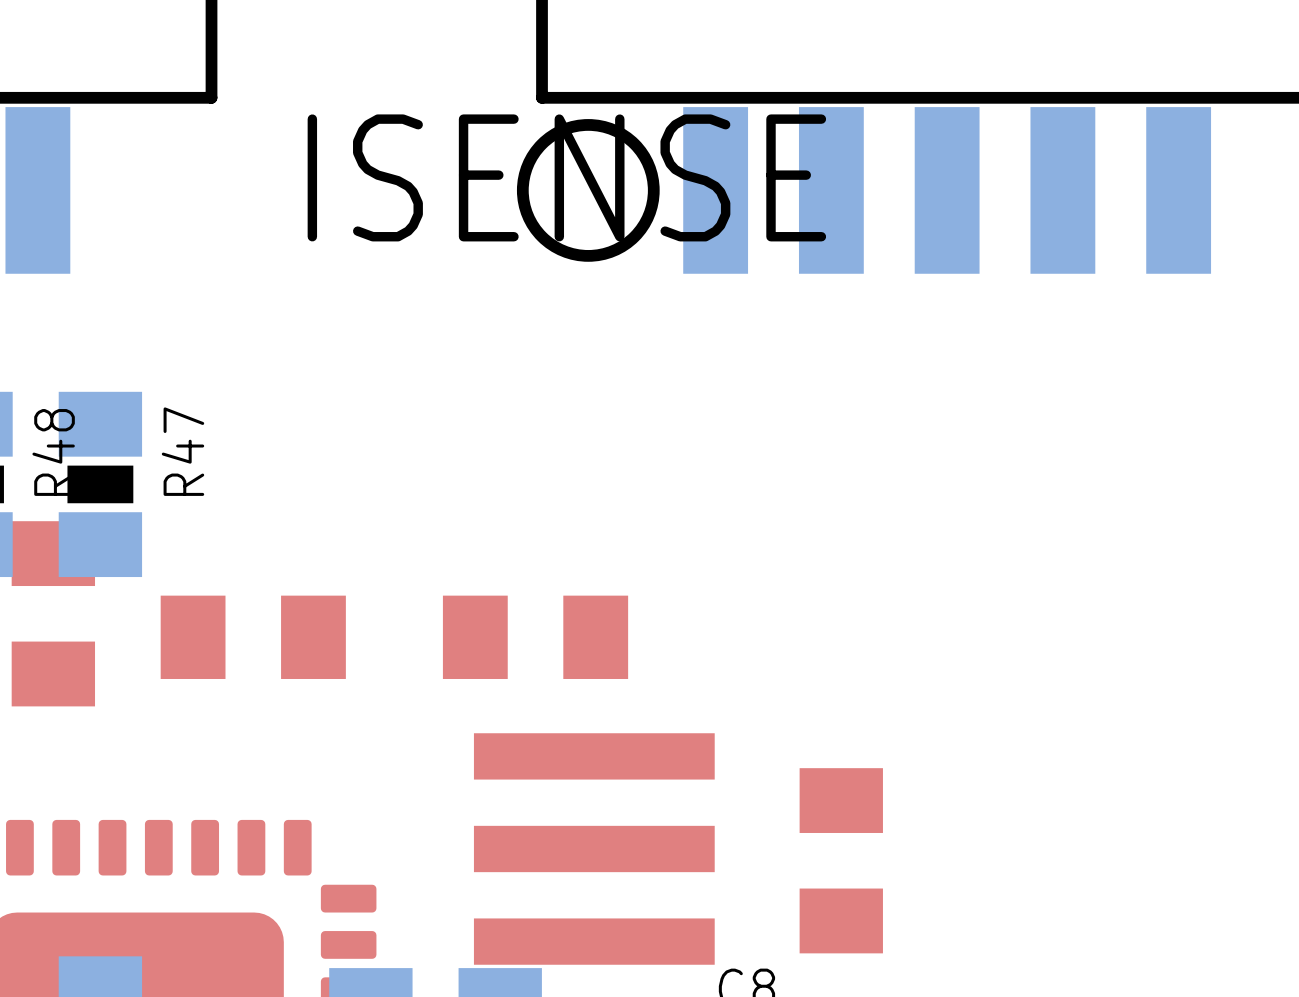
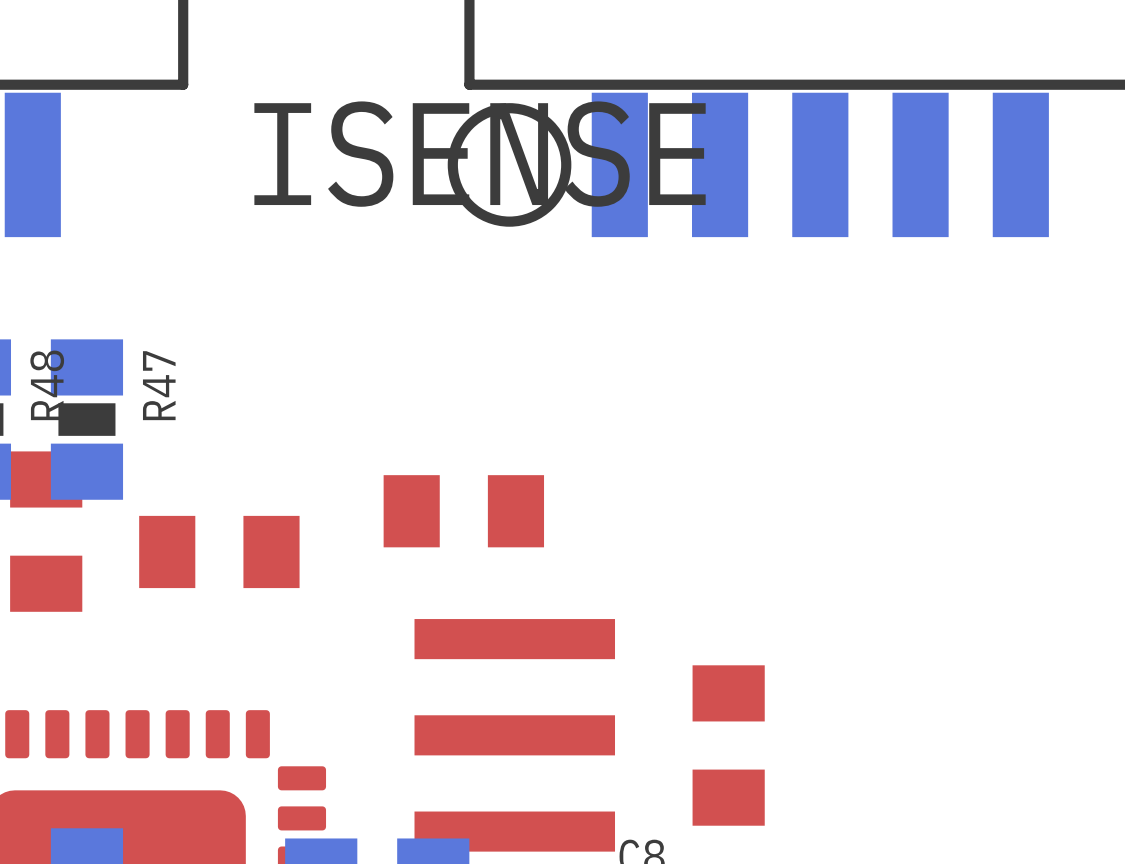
part position: (535, 637) -> (463, 511)
part footprint: [473, 733, 715, 965] -> [414, 619, 616, 852]

